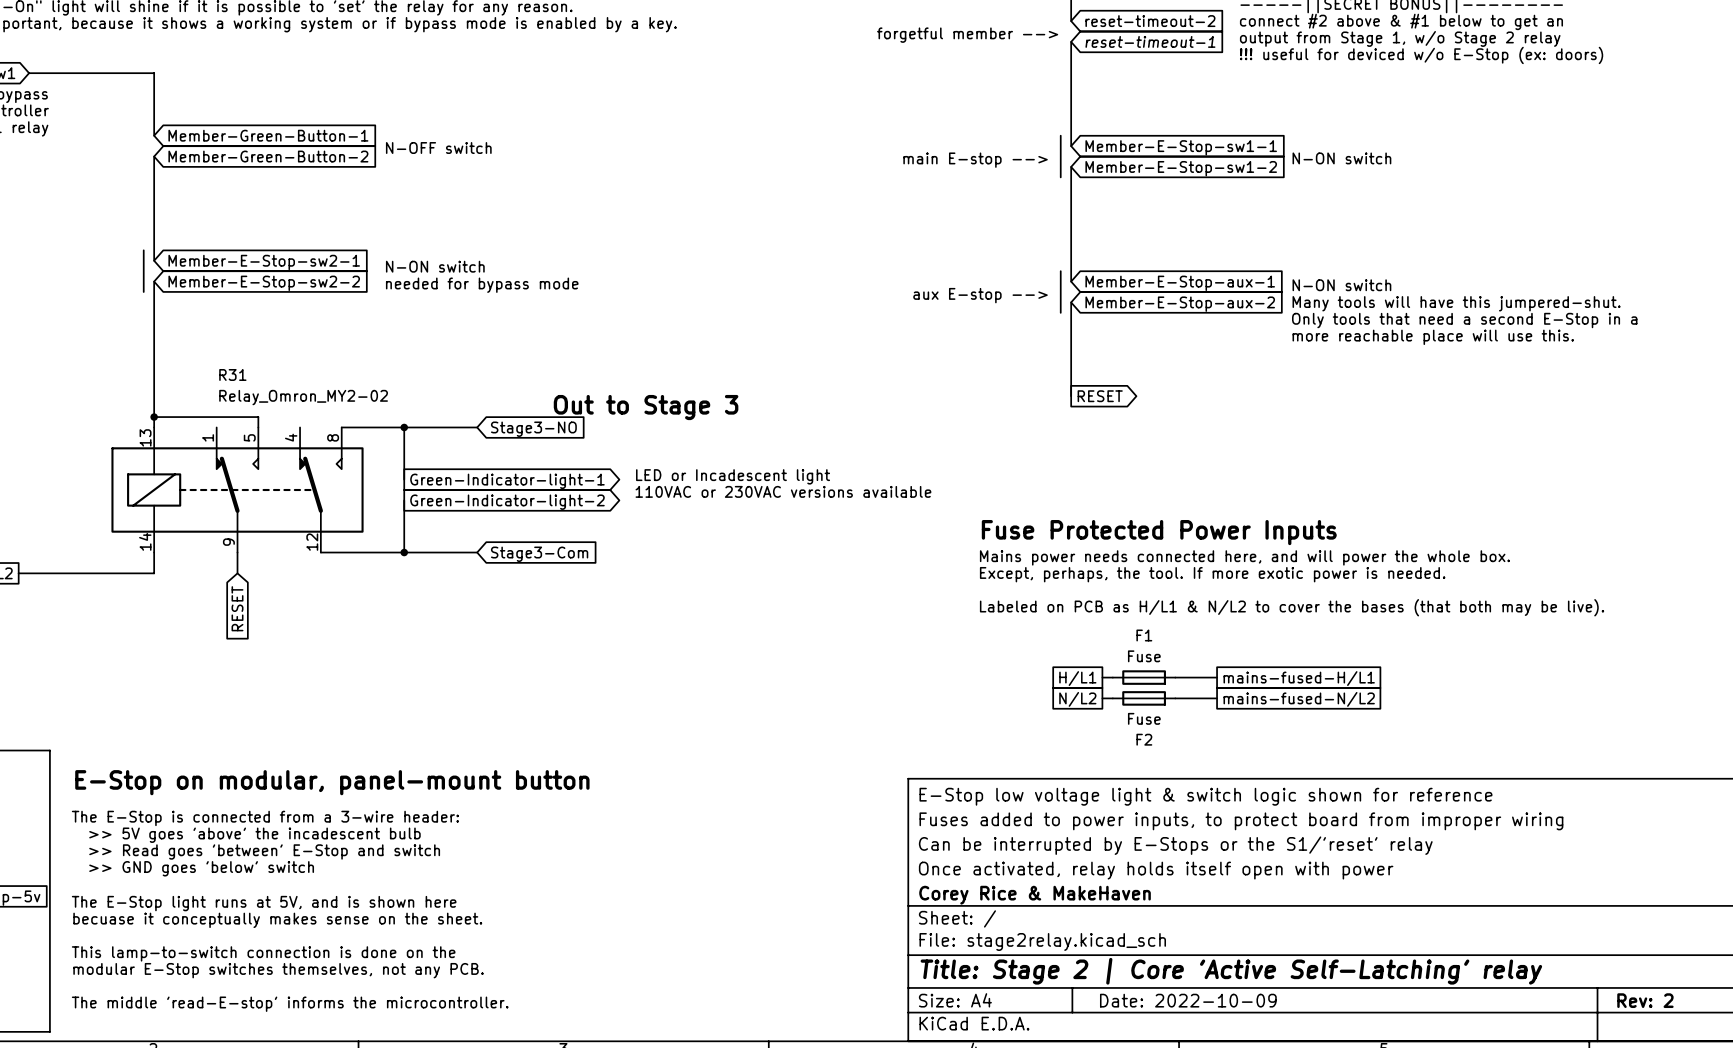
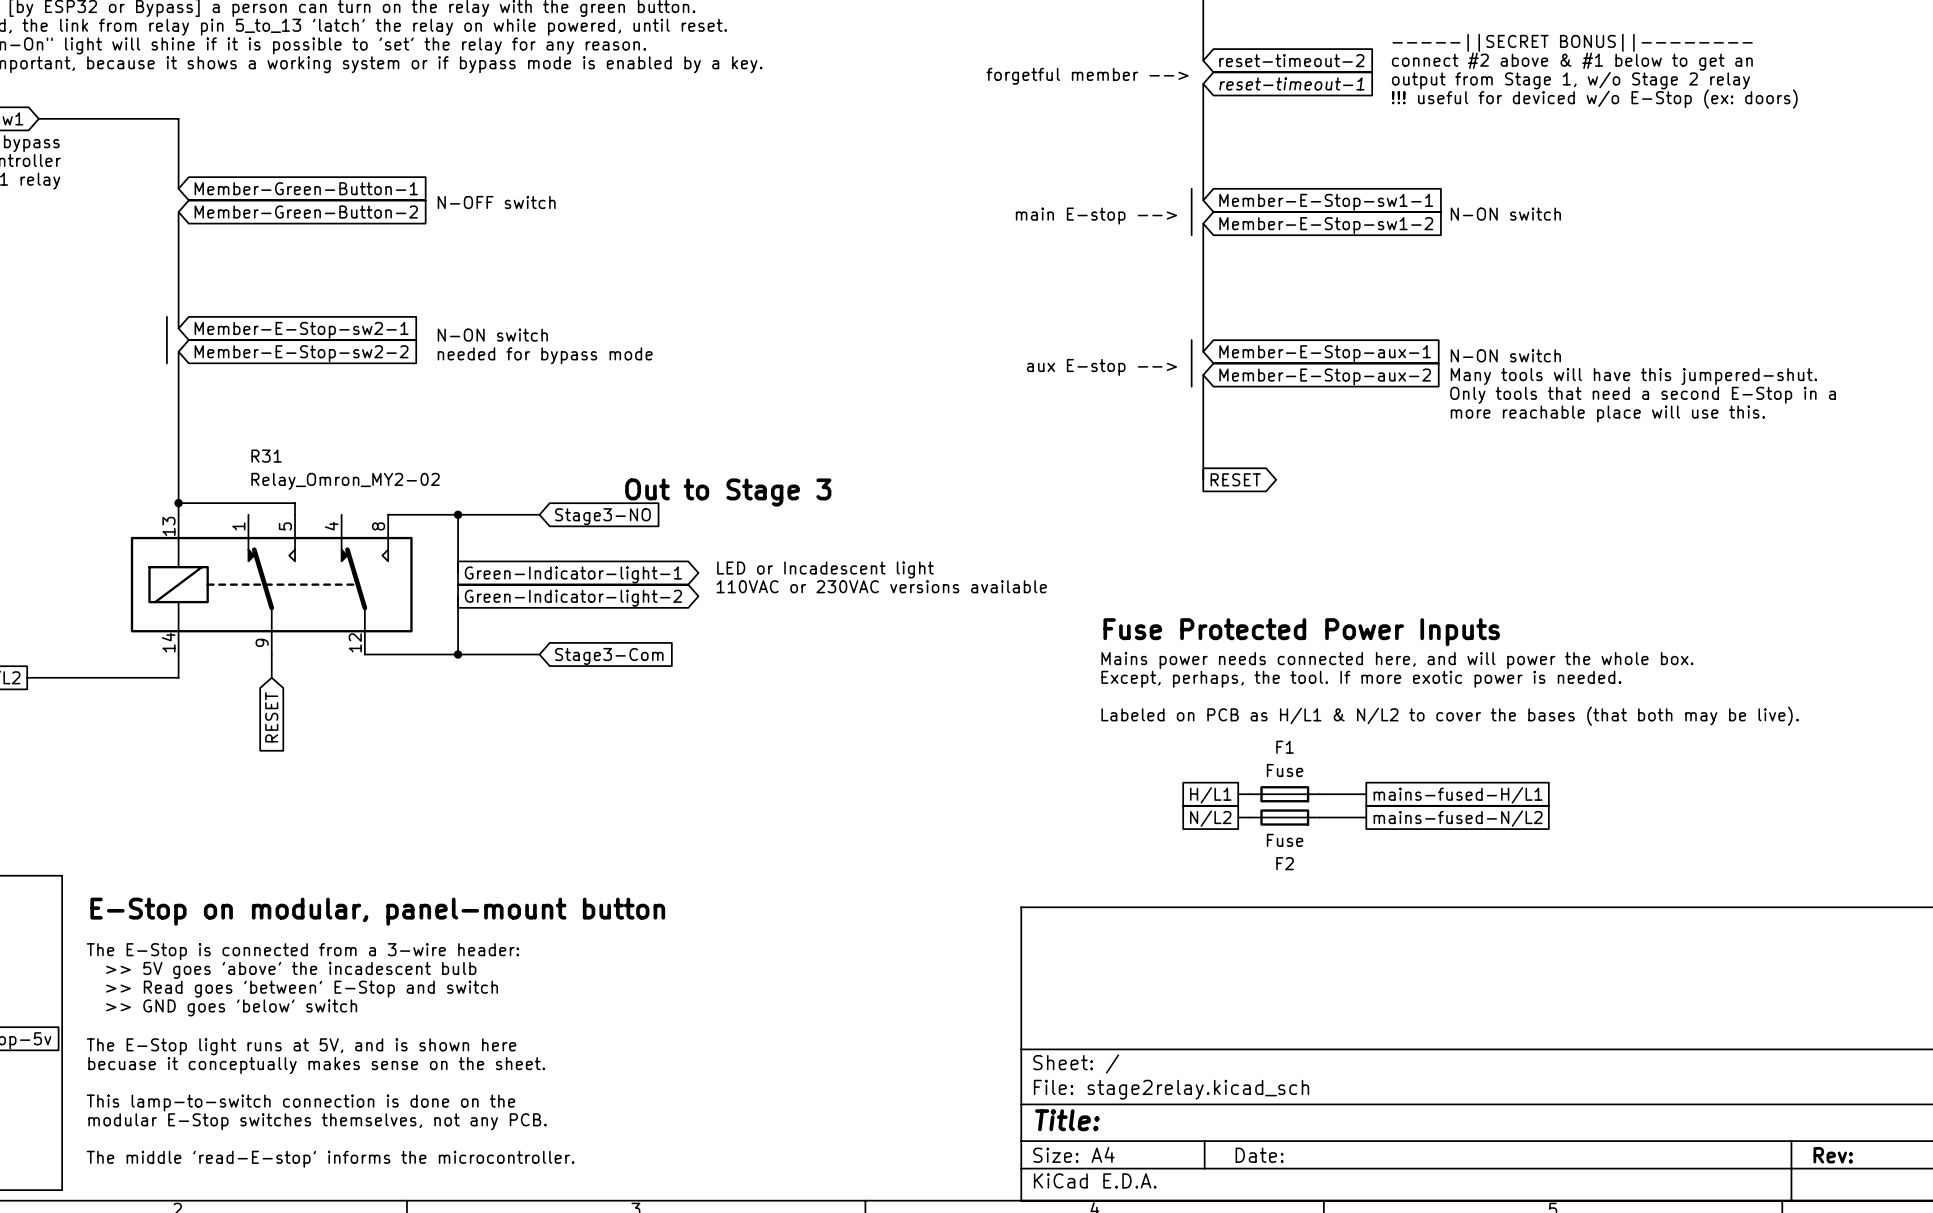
title block: E-Stop low voltage light & switch logic shown for reference (1205, 796) -> none
title block: Fuses added to power inputs, to protect board from improper wiring (1241, 821) -> none
title block: Can be interrupted by E-Stops or the S1/'reset' relay (1175, 845) -> none
title block: Once activated, relay holds itself open with power (1156, 870) -> none
title block: Corey Rice & MakeHaven (1035, 895) -> none
title block: Title: Stage 2 | Core 'Active Self-Latching' relay (1231, 971) -> Title: (1067, 1120)
title block: Date: 2022-10-09 (1188, 1000) -> Date: (1259, 1155)
title block: Rev: 2 (1645, 1000) -> Rev: (1833, 1155)

